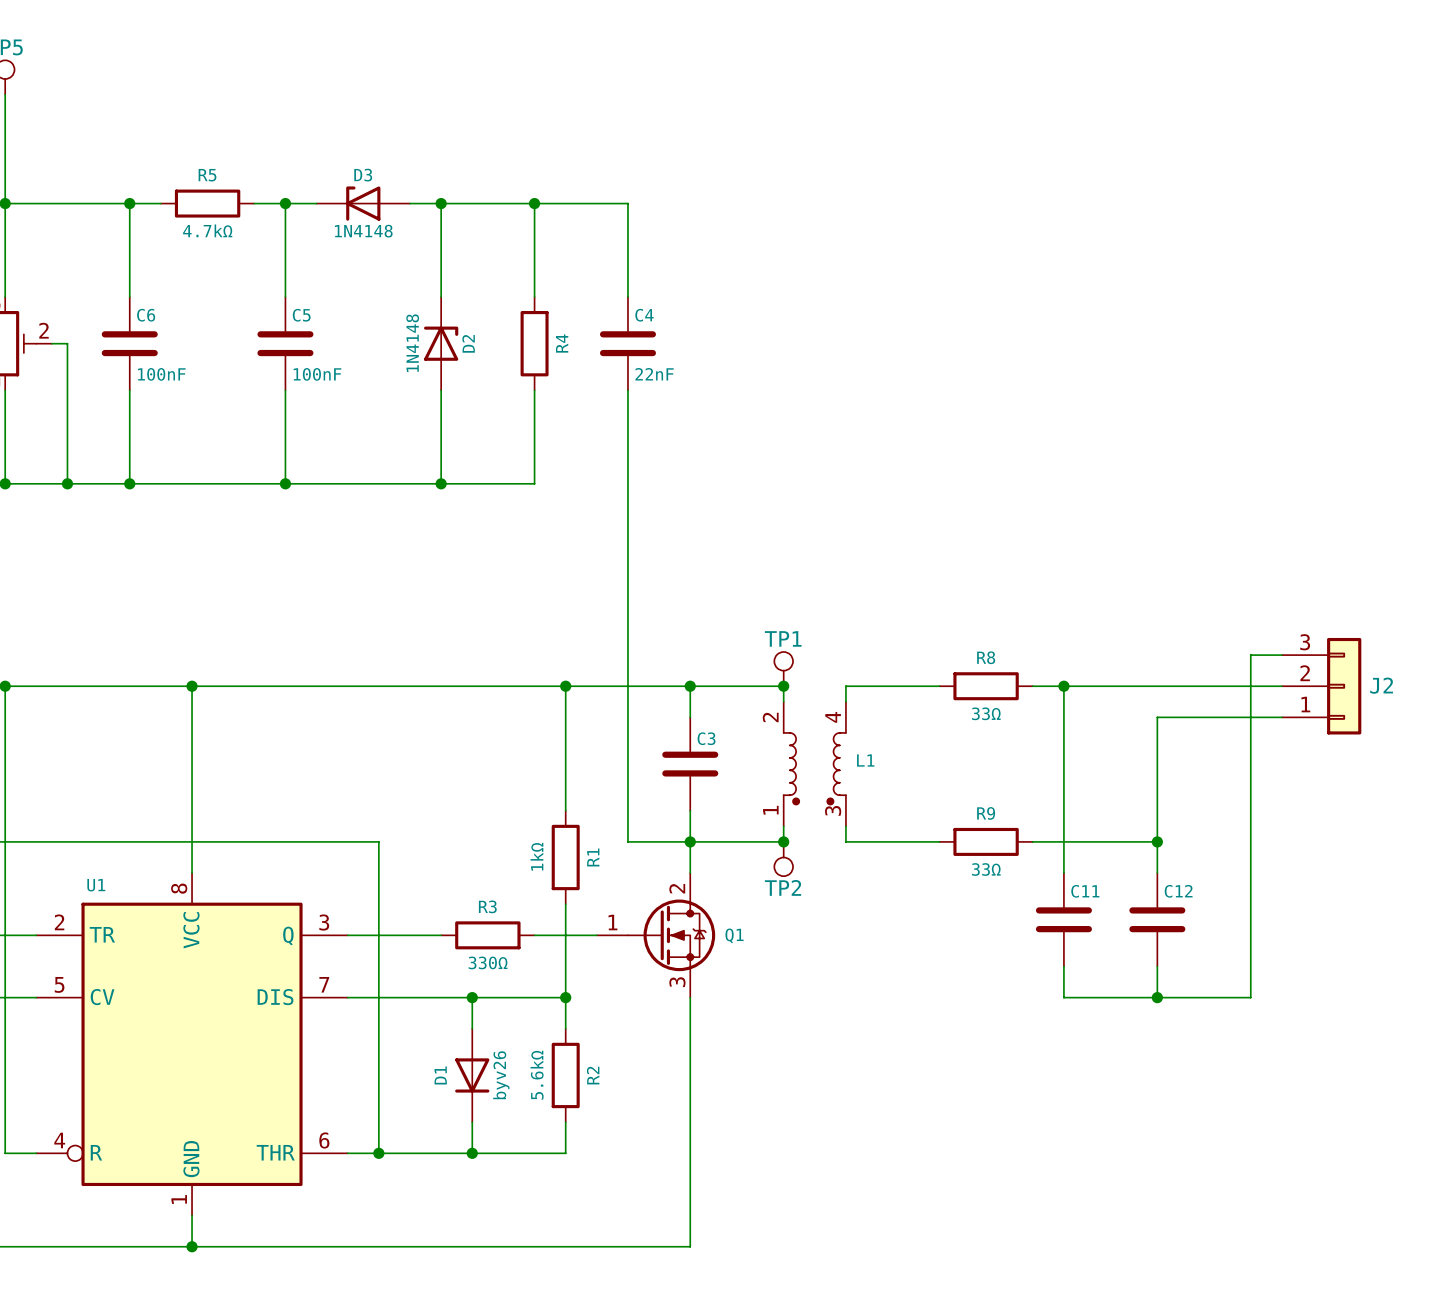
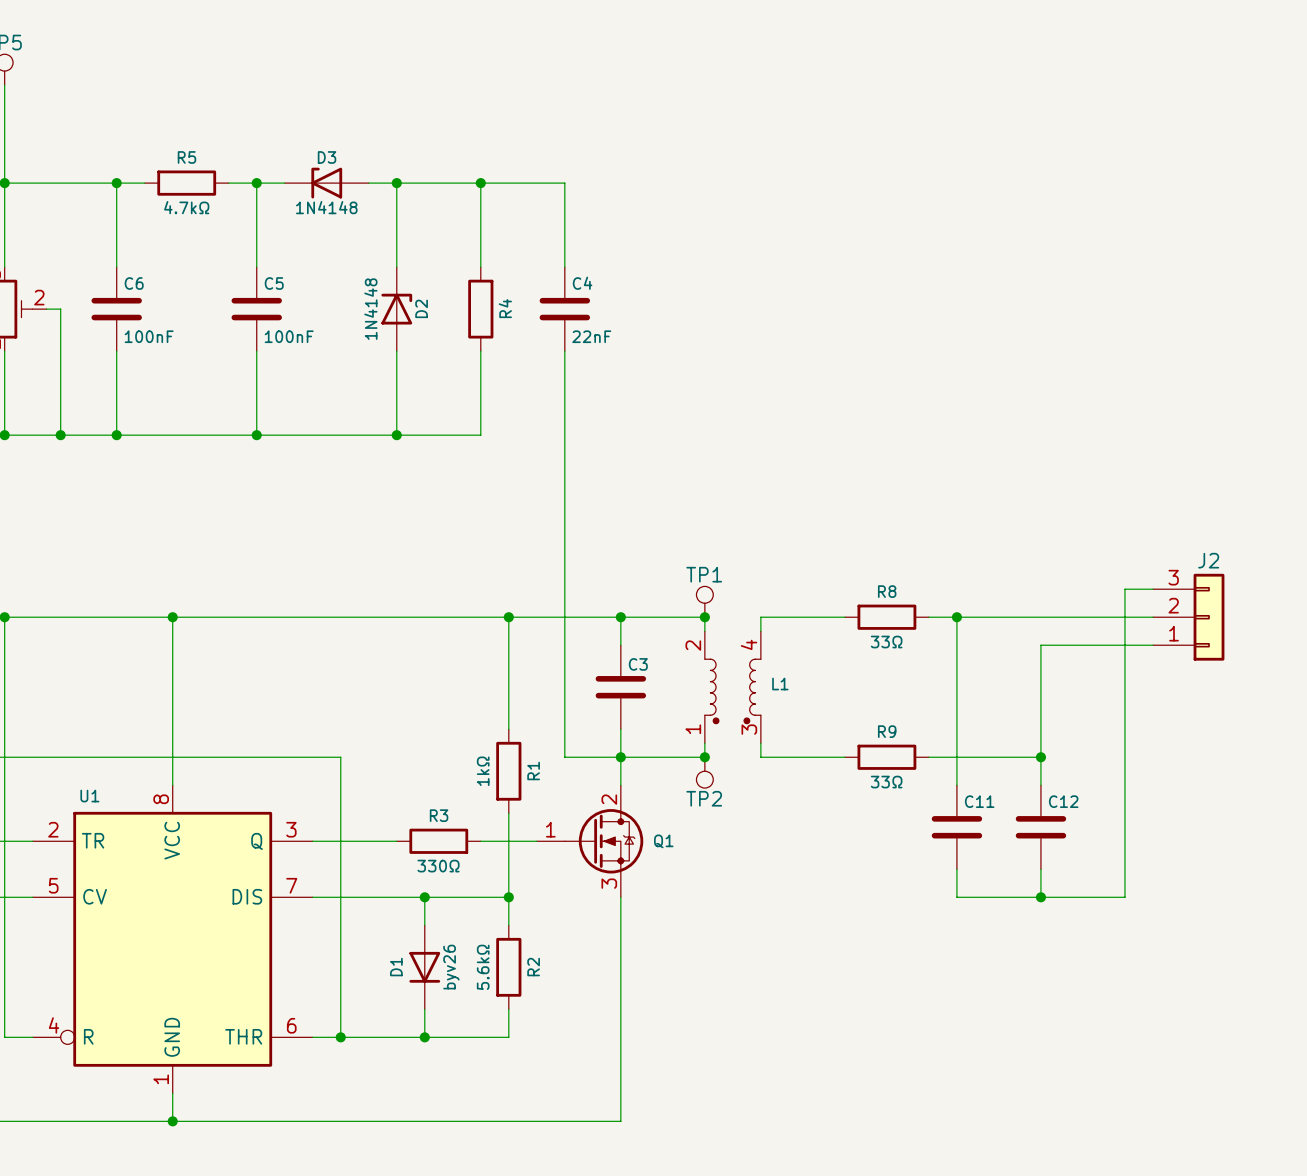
J2 name position: J2 (1381, 685) -> J2 (1208, 560)

